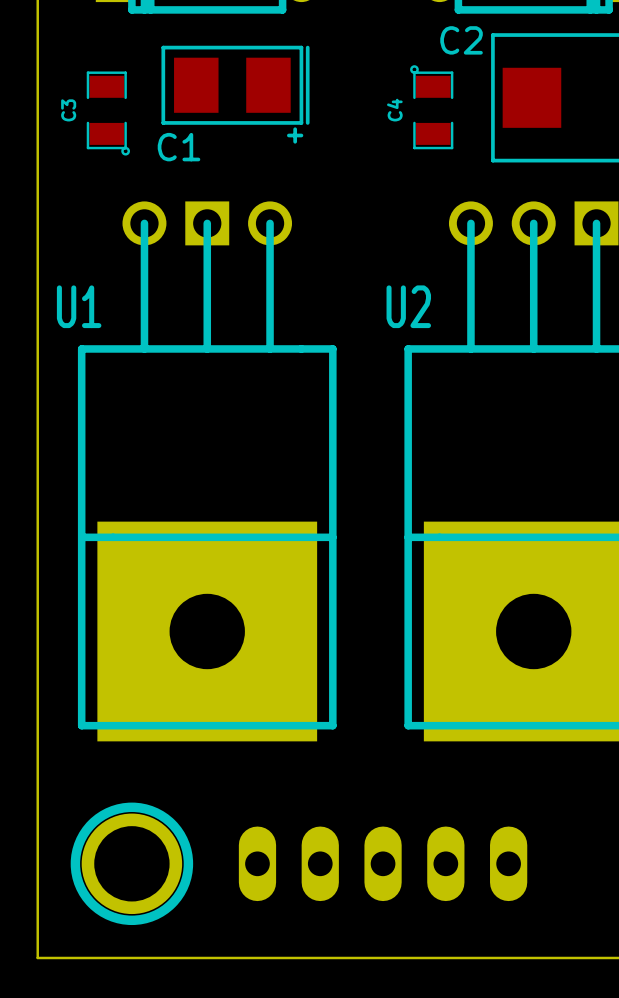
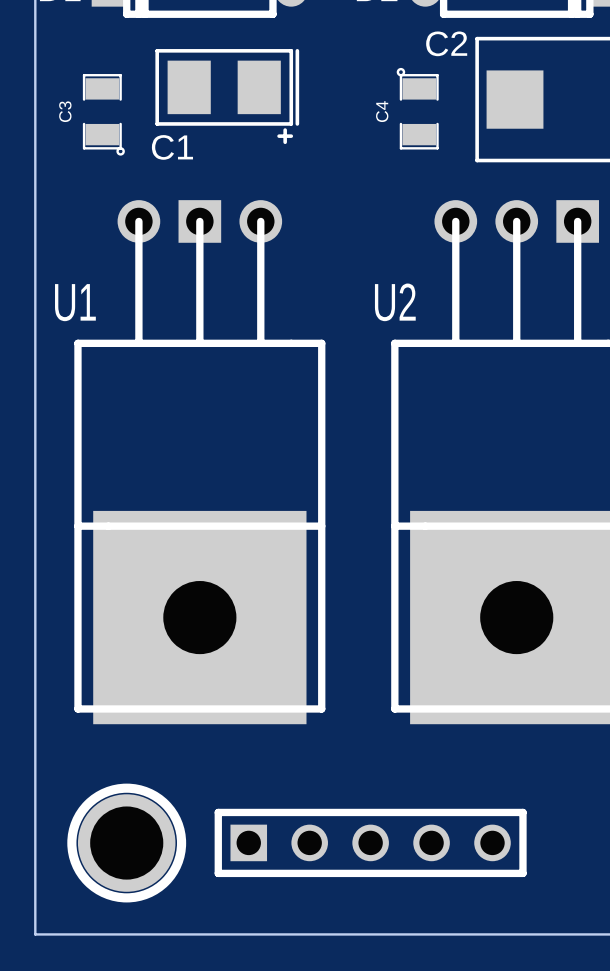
part footprint: [364, 826, 402, 902] -> [214, 808, 527, 878]
part: (257, 863) -> none
part: (320, 863) -> none
part: (445, 863) -> none
part: (508, 863) -> none

